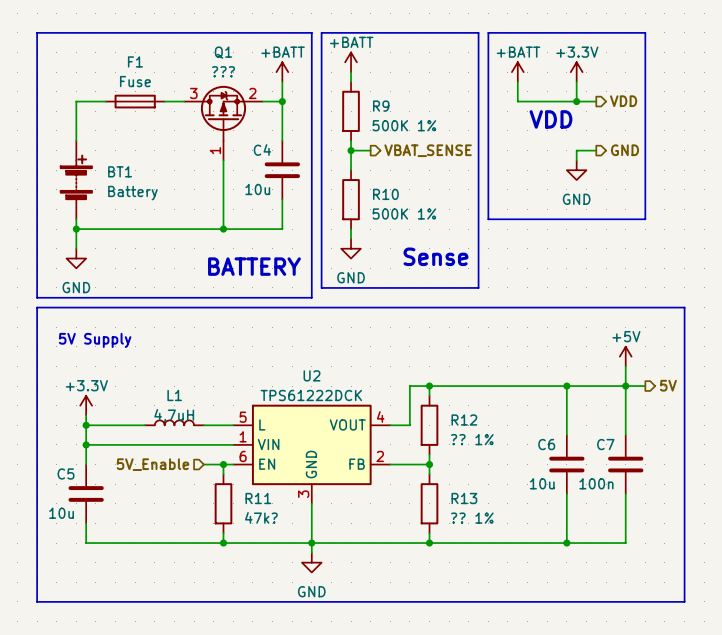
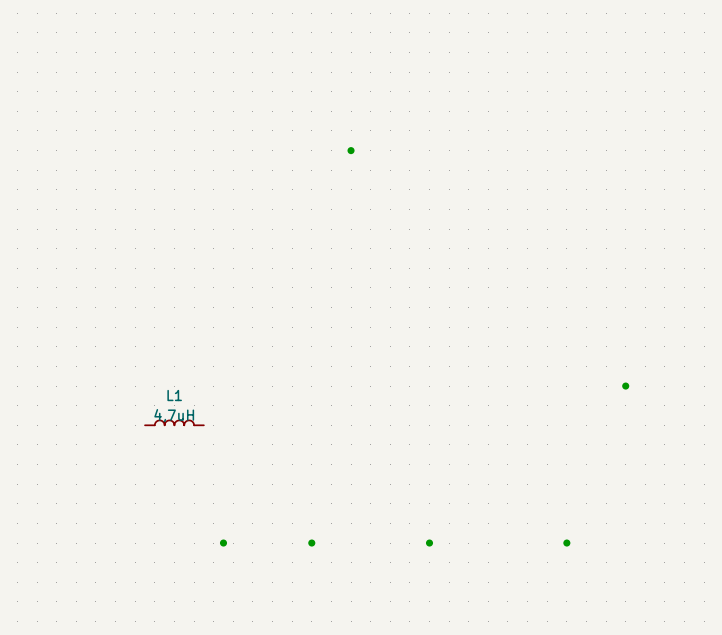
line: (37, 32) (311, 32) (311, 297) (37, 297) (37, 32) -> none
line: (321, 32) (478, 32) (478, 287) (321, 287) (321, 32) -> none
line: (488, 32) (645, 32) (645, 219) (488, 219) (488, 32) -> none
power symbol: +BATT (351, 62) -> none
power symbol: +BATT (282, 72) -> none
wire: (351, 72) (351, 81) -> none
power symbol: +BATT (517, 72) -> none
power symbol: +3.3V (576, 72) -> none
wire: (282, 81) (282, 140) -> none
wire: (517, 81) (517, 101) (596, 101) -> none
wire: (576, 81) (576, 101) -> none
wire: (105, 101) (76, 101) (76, 140) -> none
F1: Fuse (135, 101) -> none
wire: (164, 101) (184, 101) -> none
wire: (262, 101) (282, 101) -> none
junction: (282, 101) -> none
junction: (576, 101) -> none
hierarchical label: VDD (623, 101) -> none
R9: 500K 1% (351, 111) -> none
text: VDD (550, 119) -> none
Q1: ??? (223, 123) -> none
wire: (351, 140) (351, 170) -> none
wire: (351, 150) (370, 150) -> none
hierarchical label: VBAT_SENSE (428, 150) -> none
wire: (596, 150) (576, 150) (576, 160) -> none
hierarchical label: GND (624, 150) -> none
wire: (223, 160) (223, 229) -> none
C4: 10u (282, 170) -> none
power symbol: GND (576, 170) -> none
BT1: Battery (76, 180) -> none
wire: (282, 199) (282, 229) (76, 229) -> none
R10: 500K 1% (351, 199) -> none
wire: (76, 219) (76, 248) -> none
junction: (76, 229) -> none
junction: (223, 229) -> none
wire: (351, 229) (351, 238) -> none
power symbol: GND (351, 248) -> none
text: Sense (435, 256) -> none
power symbol: GND (76, 258) -> none
text: BATTERY (254, 266) -> none
line: (37, 307) (37, 601) (684, 601) (684, 307) (37, 307) -> none
text: 5V Supply (95, 340) -> none
power symbol: +5V (625, 356) -> none
wire: (625, 366) (625, 435) -> none
hierarchical label: 5V (668, 385) -> none
wire: (429, 386) (429, 395) -> none
junction: (429, 386) -> none
wire: (566, 386) (566, 435) -> none
junction: (566, 386) -> none
wire: (645, 386) (409, 386) (409, 425) (390, 425) -> none
power symbol: +3.3V (86, 405) -> none
wire: (86, 415) (86, 464) -> none
wire: (86, 425) (145, 425) -> none
junction: (86, 425) -> none
wire: (203, 425) (233, 425) -> none
R12: ?? 1% (429, 425) -> none
wire: (86, 444) (233, 444) -> none
junction: (86, 444) -> none
U2: TPS61222DCK (311, 454) -> none
wire: (429, 454) (429, 474) -> none
hierarchical label: 5V_Enable (152, 464) -> none
wire: (203, 464) (233, 464) -> none
wire: (223, 464) (223, 474) -> none
junction: (223, 464) -> none
wire: (390, 464) (429, 464) -> none
junction: (429, 464) -> none
C6: 10u (566, 464) -> none
C7: 100n (625, 464) -> none
C5: 10u (86, 493) -> none
wire: (566, 493) (566, 543) -> none
wire: (625, 493) (625, 543) (86, 543) (86, 523) -> none
R11: 47k? (223, 503) -> none
wire: (311, 503) (311, 552) -> none
R13: ?? 1% (429, 503) -> none
wire: (223, 533) (223, 543) -> none
wire: (429, 533) (429, 543) -> none
power symbol: GND (311, 562) -> none

